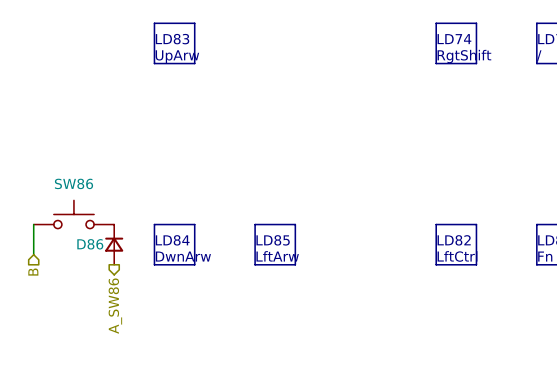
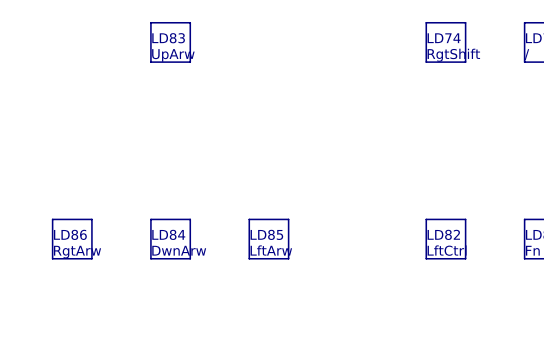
SW86: (73, 214) -> none
wire: (33, 224) (33, 254) -> none
line: none -> (52, 219) (91, 219) (91, 258) (52, 258) (52, 219)
text: none -> LD86 (70, 234)
D86: (114, 244) -> none
text: none -> RgtArw (77, 252)
hierarchical label: B (33, 272) -> none
hierarchical label: A_SW86 (115, 306) -> none

